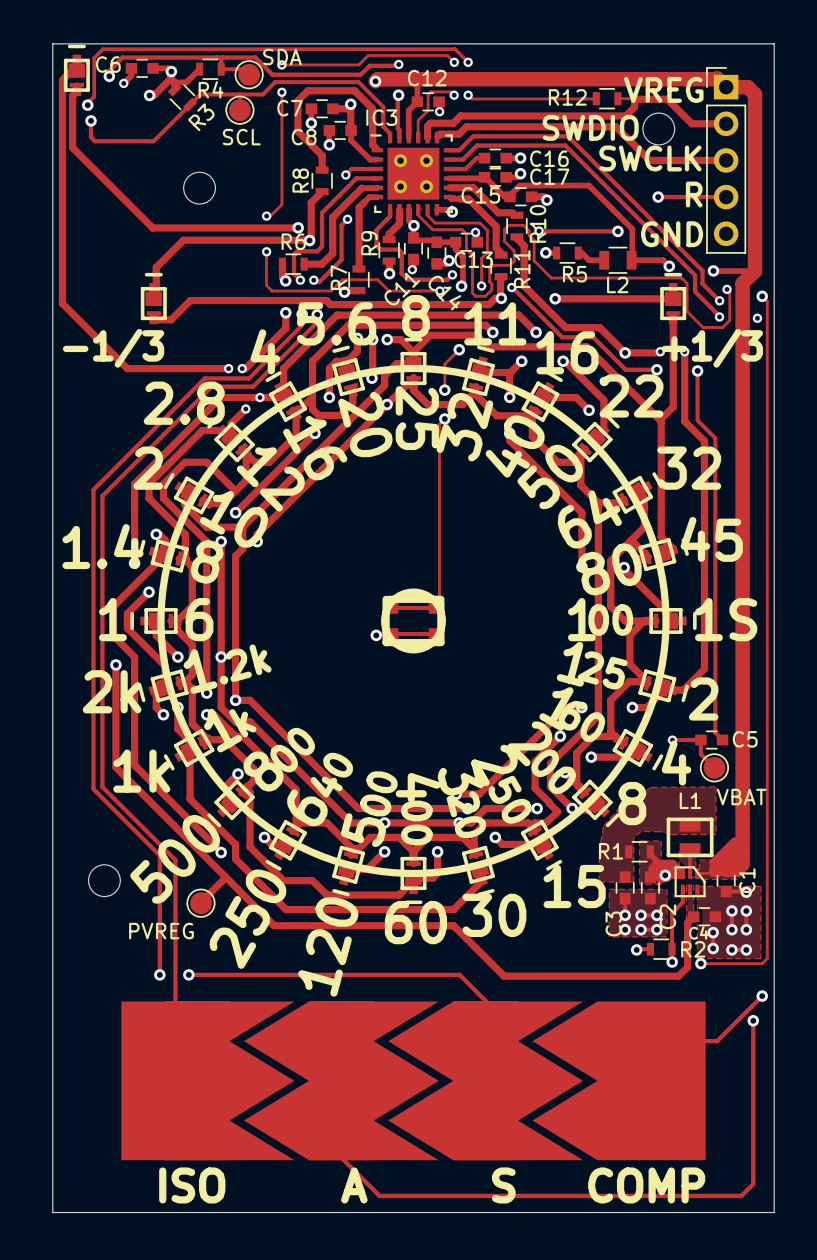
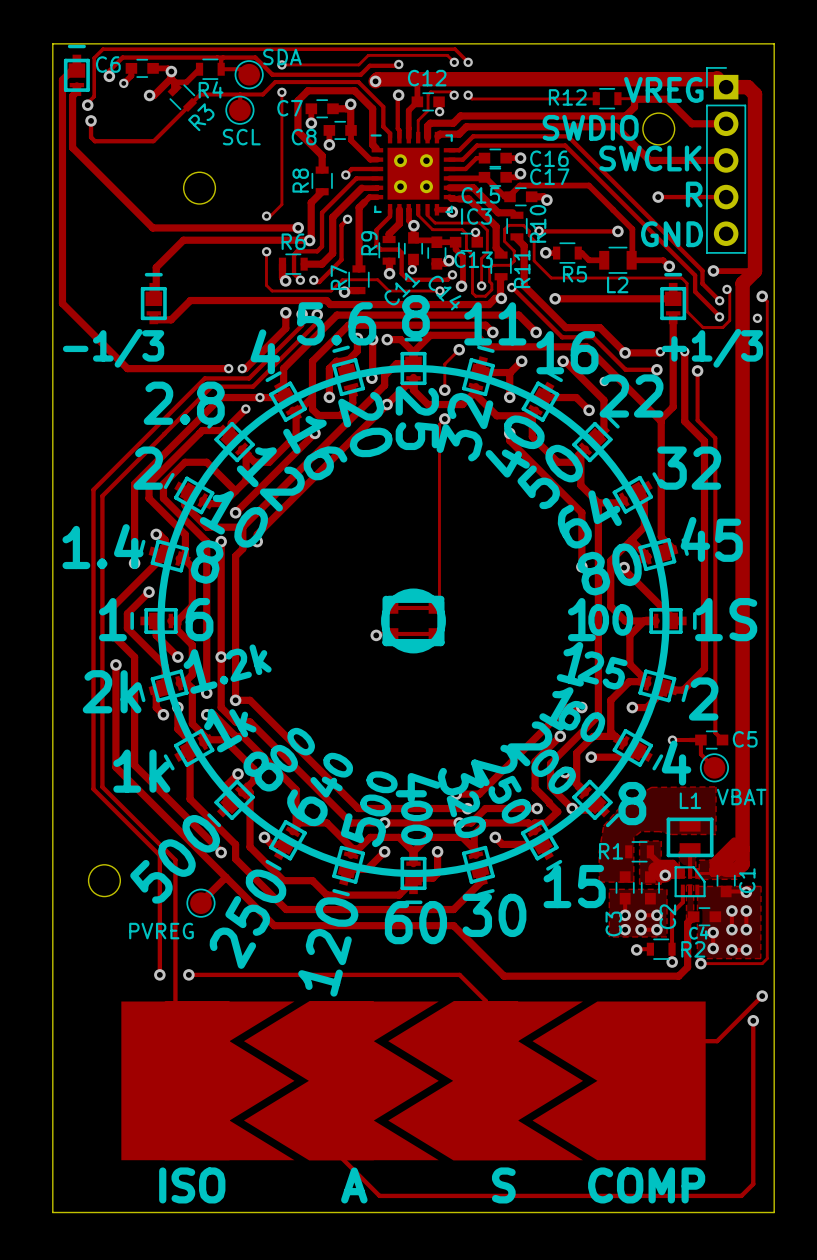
IC3 name position: IC3 (381, 117) -> IC3 (476, 216)

